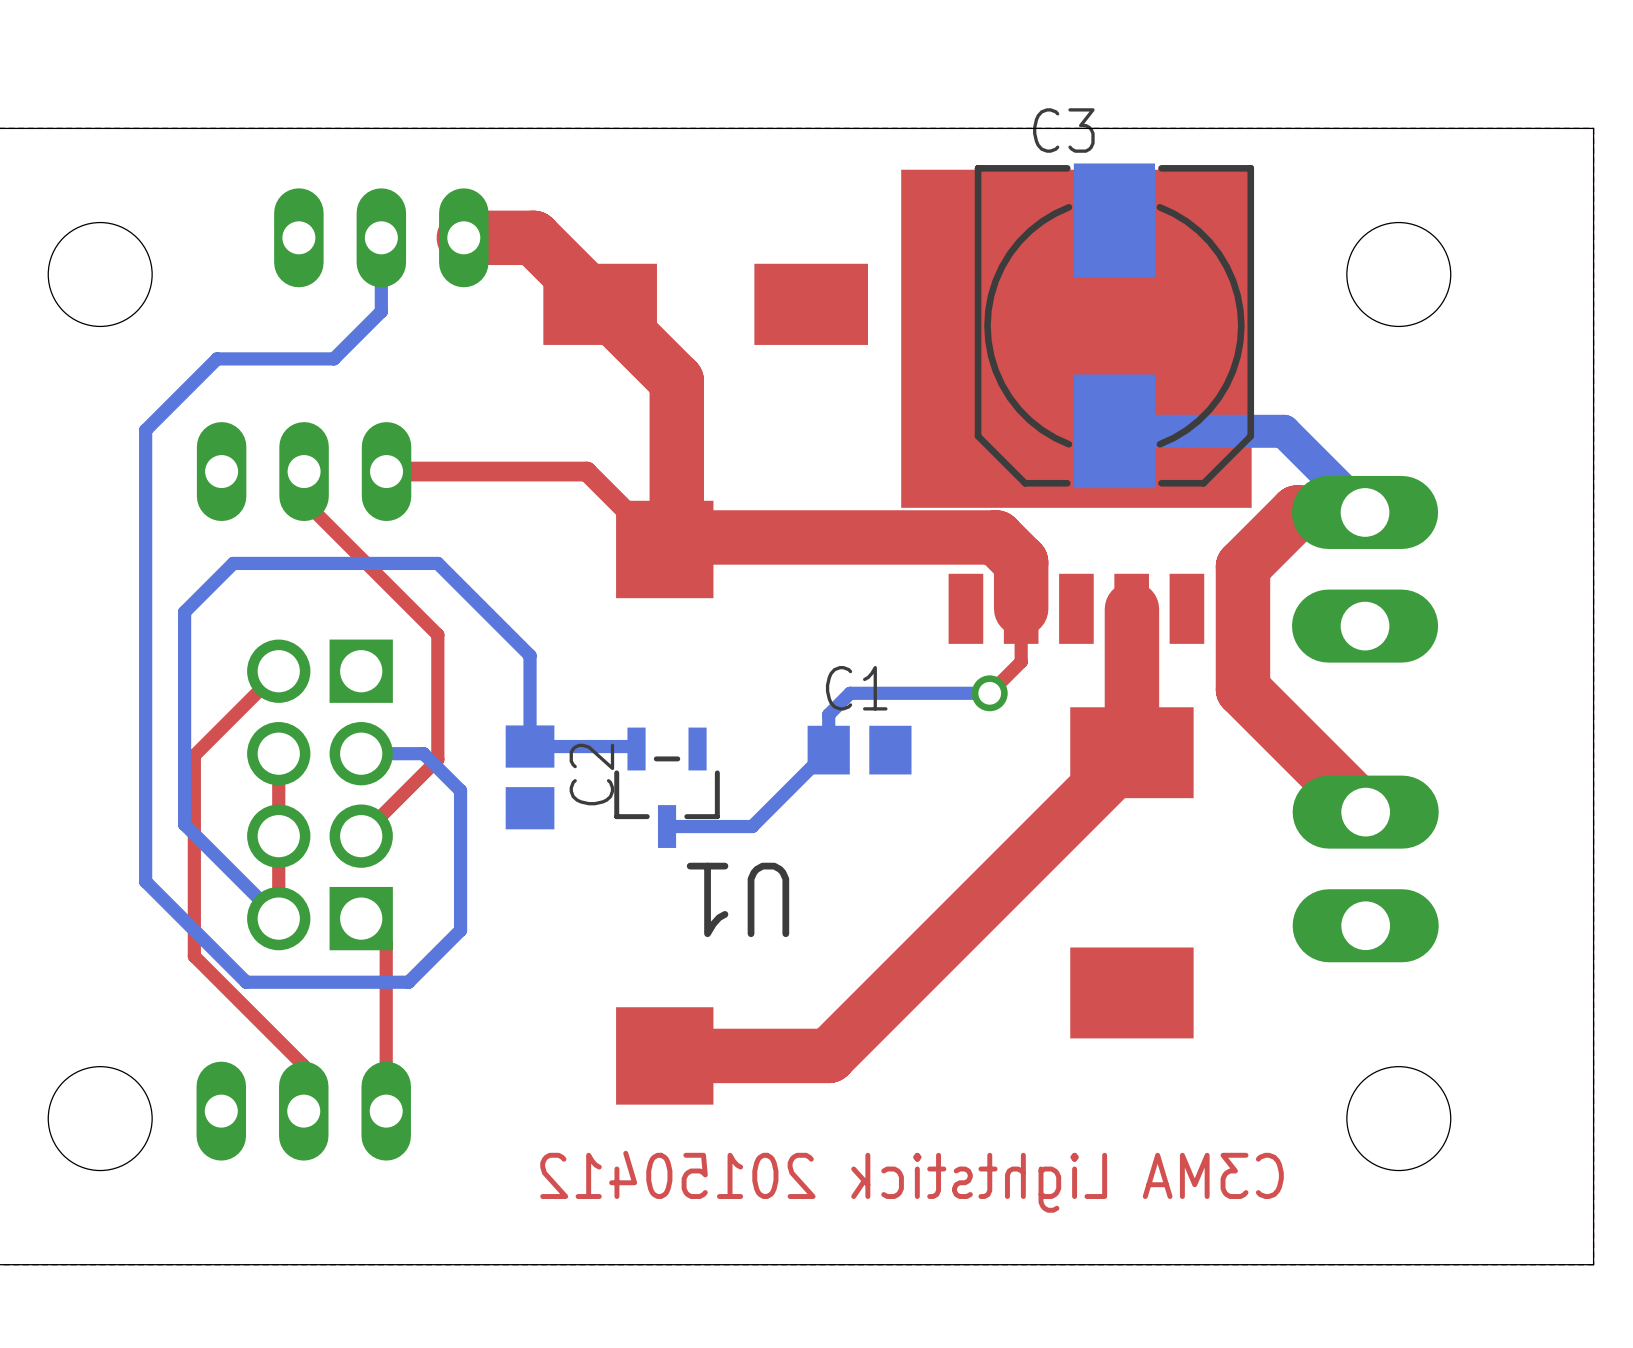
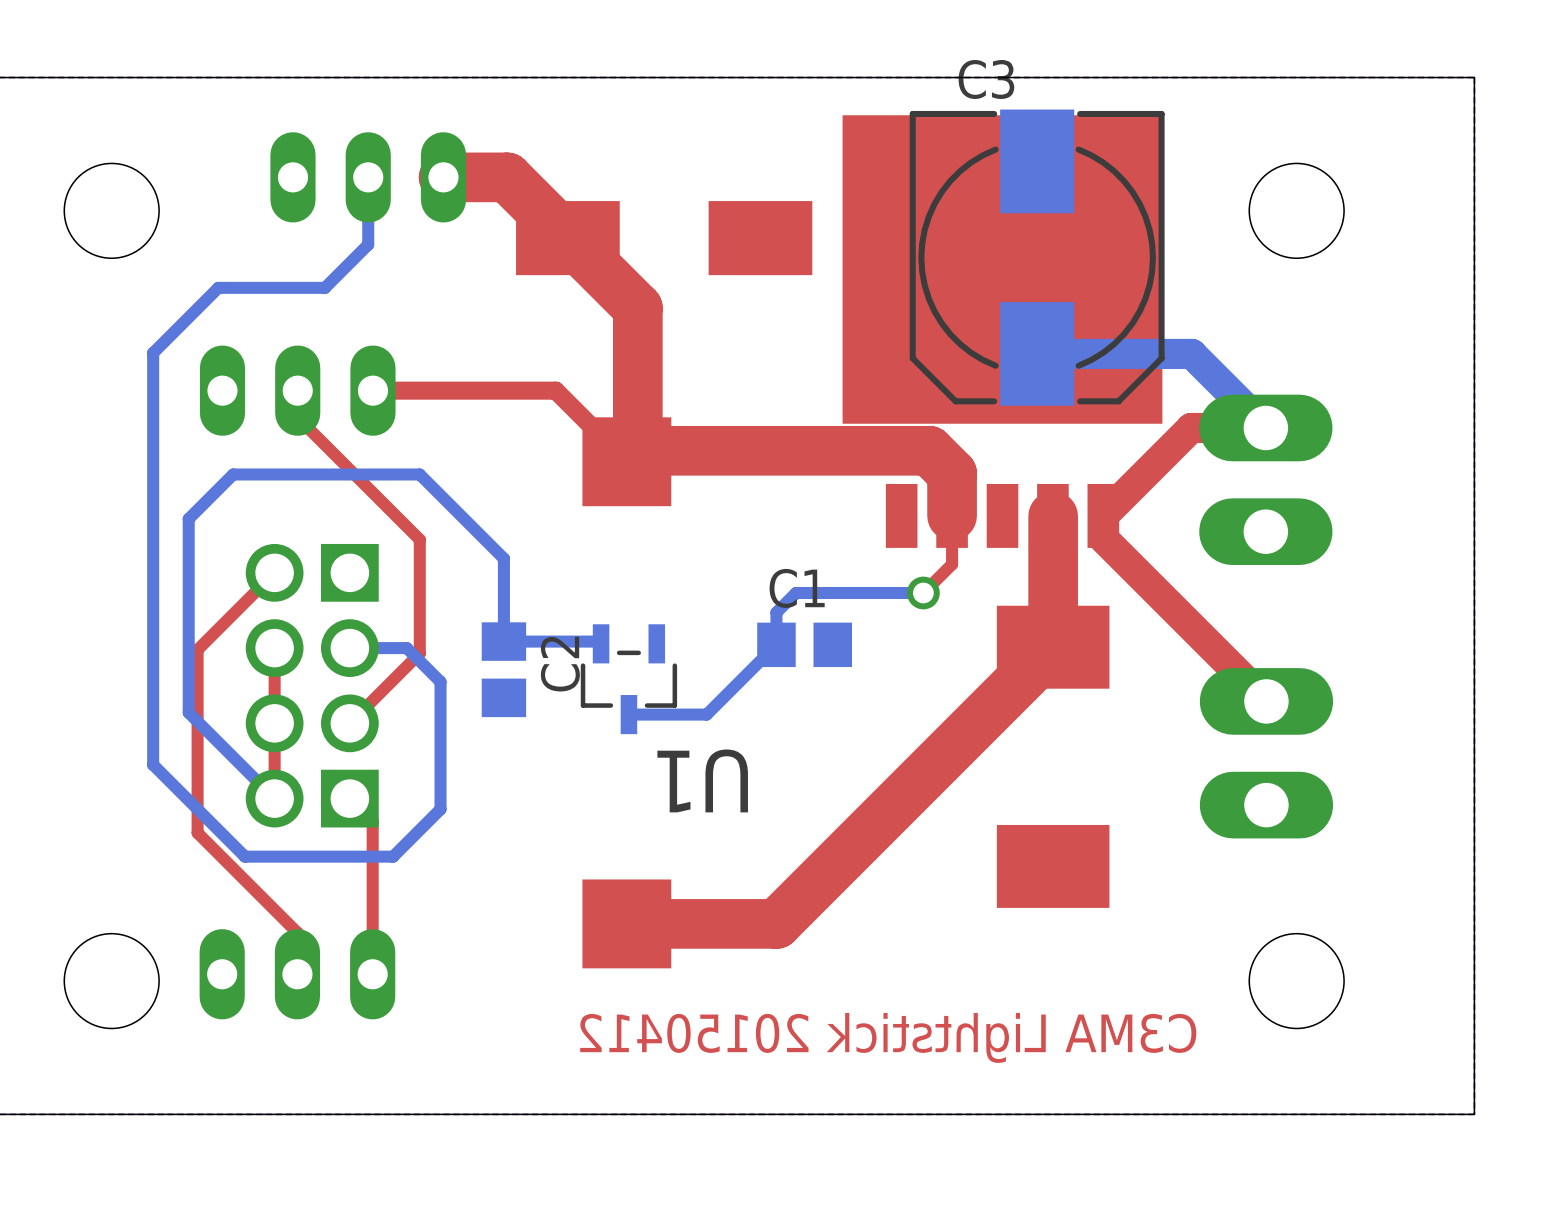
top track: (1297, 512) (1242, 566) (1242, 689) -> (1203, 427) (1191, 427) (1103, 515)
top track: none -> (1103, 538) (1154, 589)
top track width: thick (1242, 689) (1365, 812) -> thin (1154, 589) (1266, 701)

